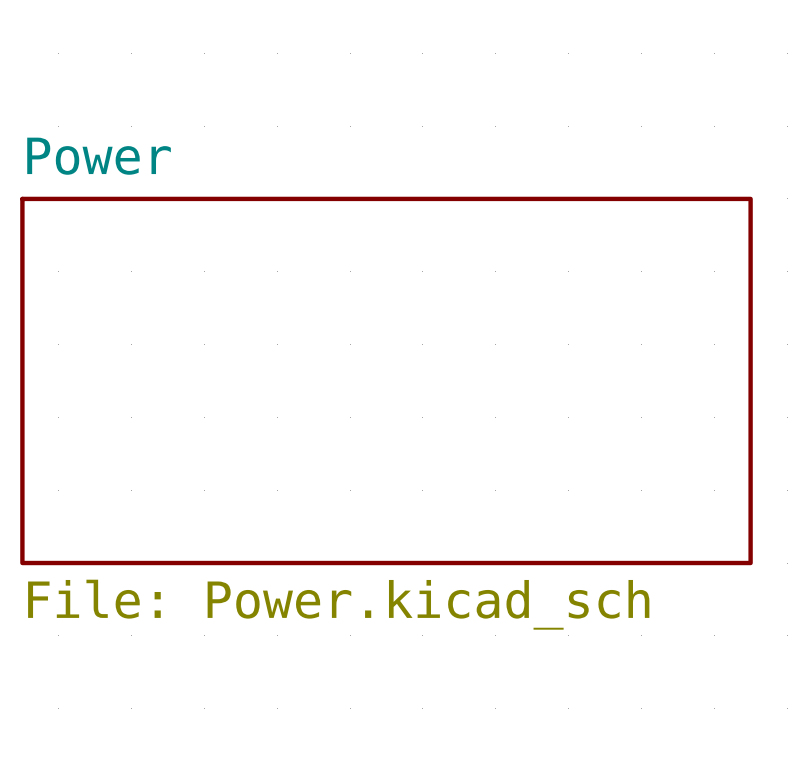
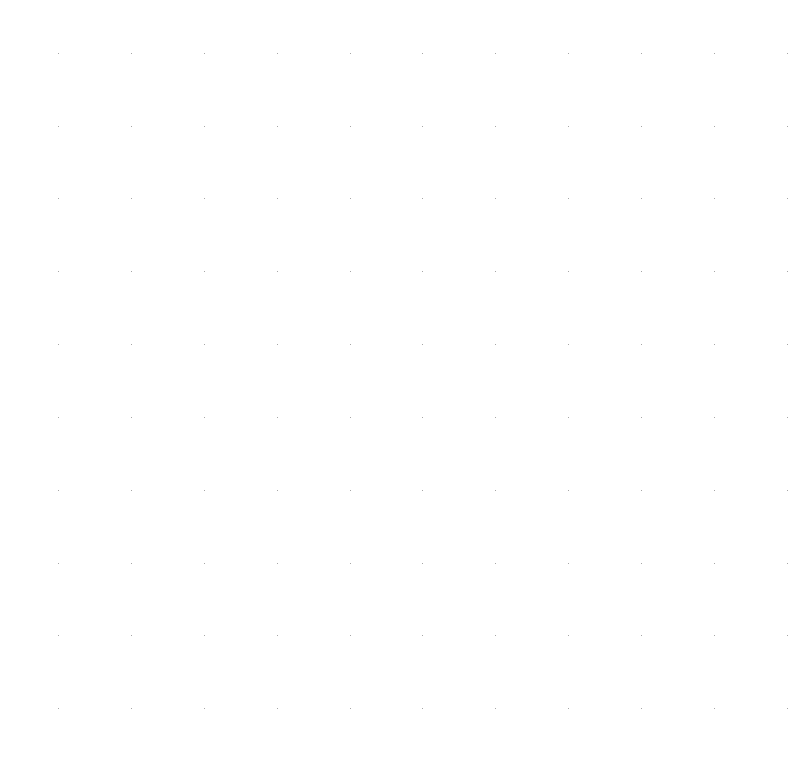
sheet Power: File: Power.kicad_sch (386, 380) -> none

